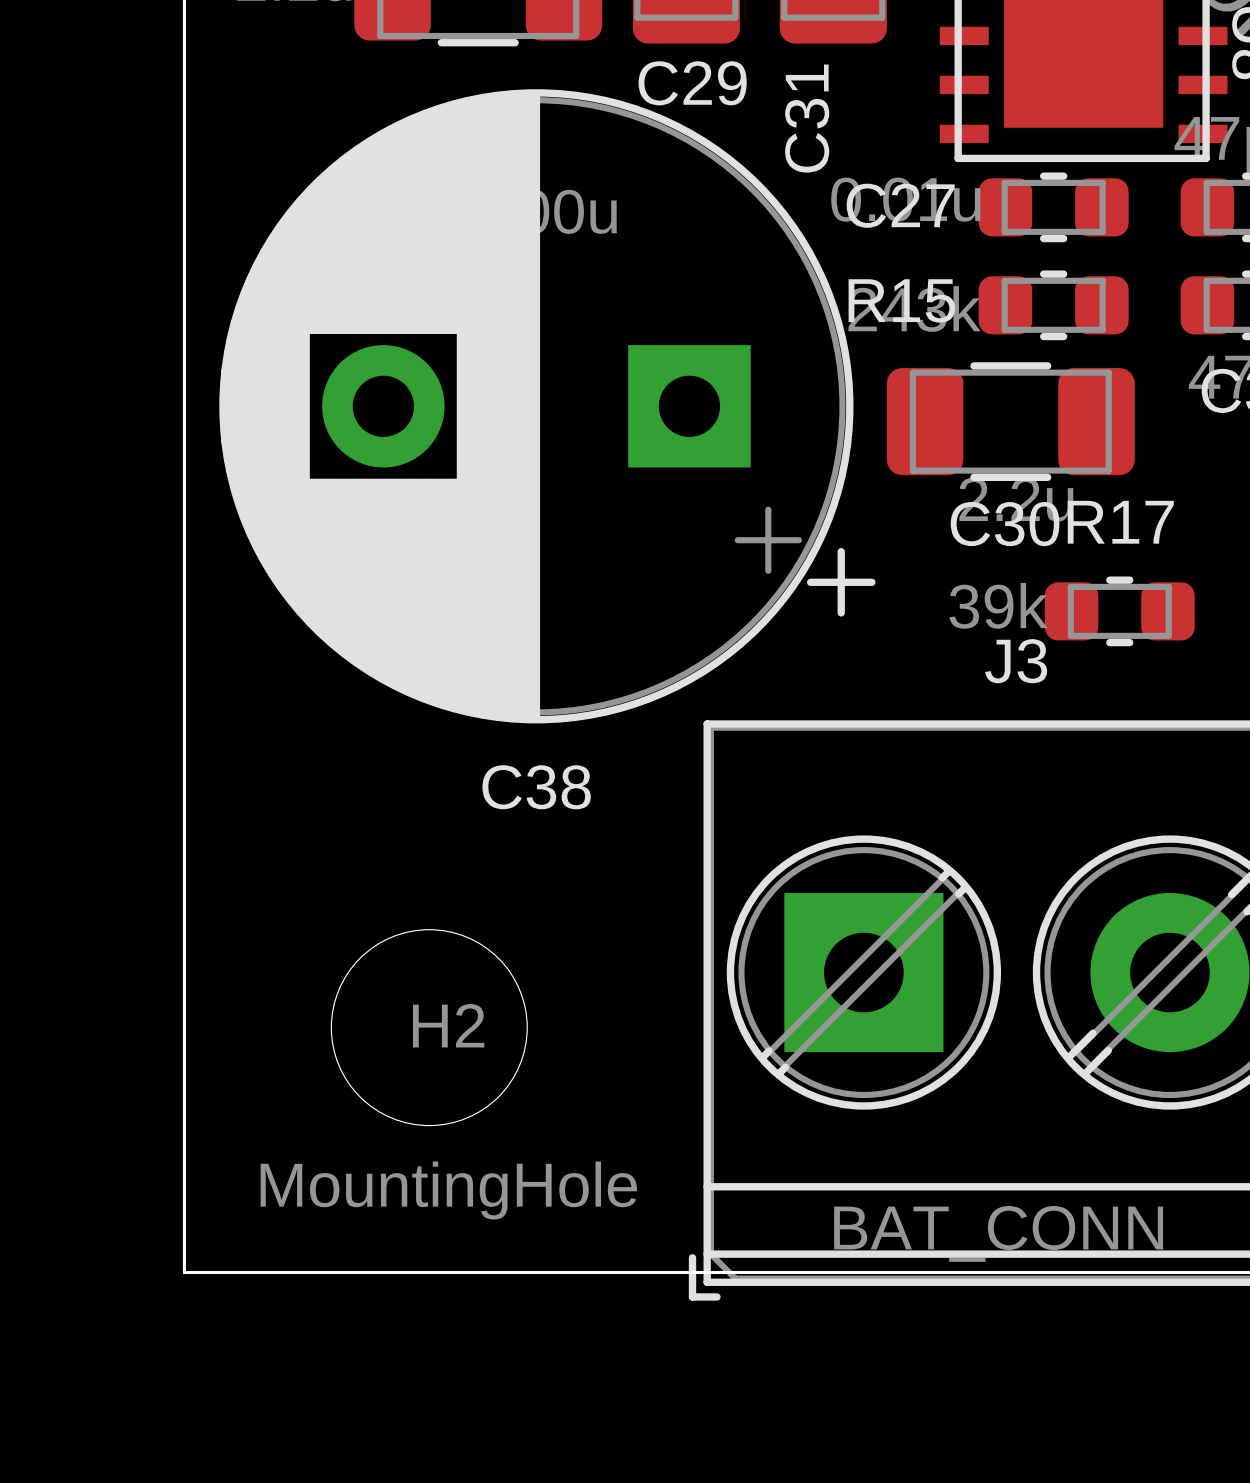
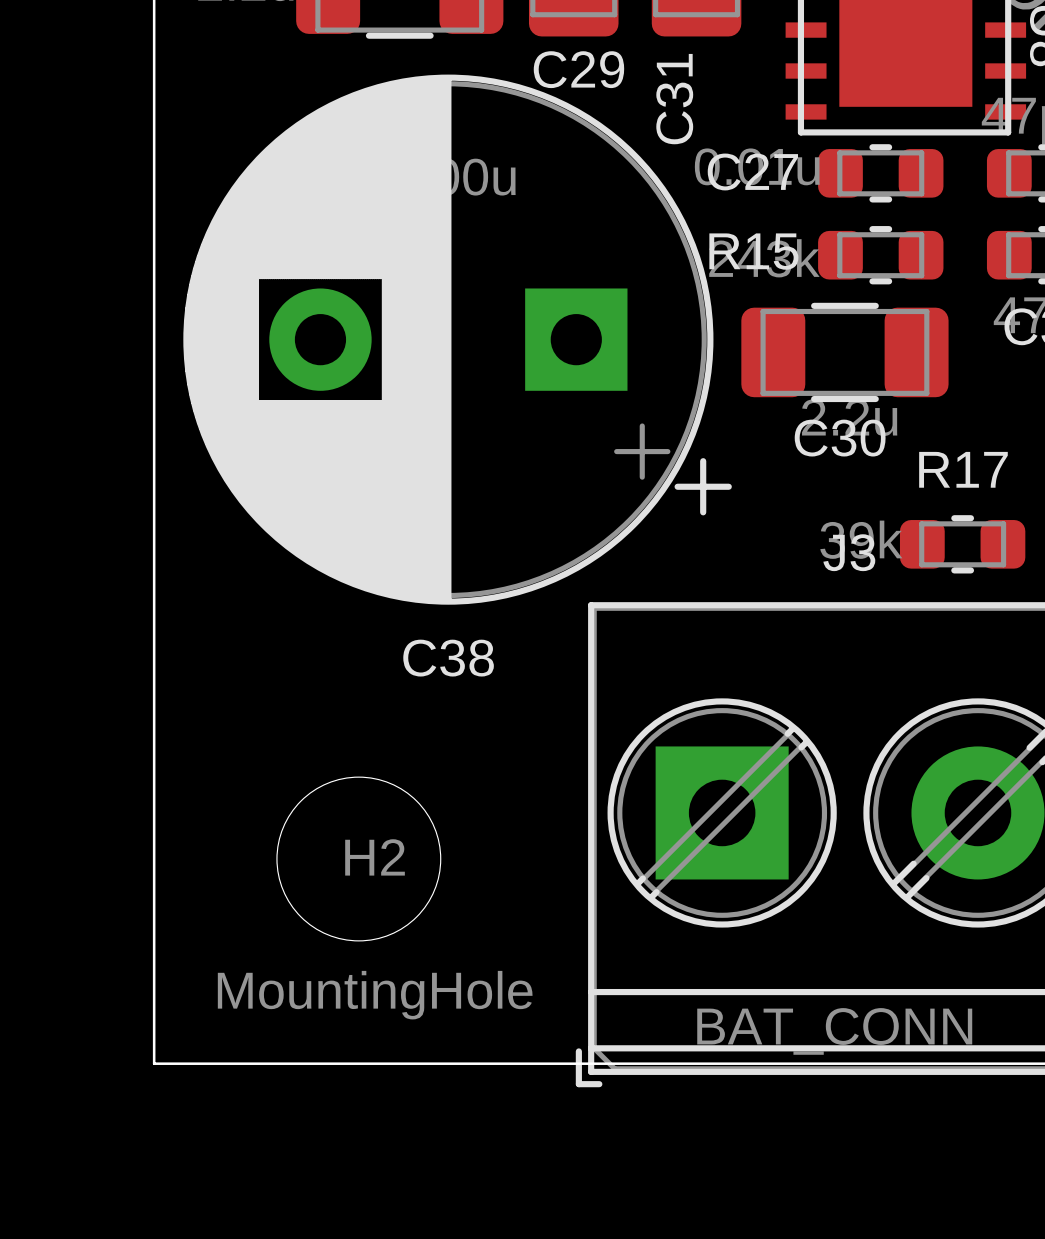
R17 position: (1119, 611) -> (962, 544)

